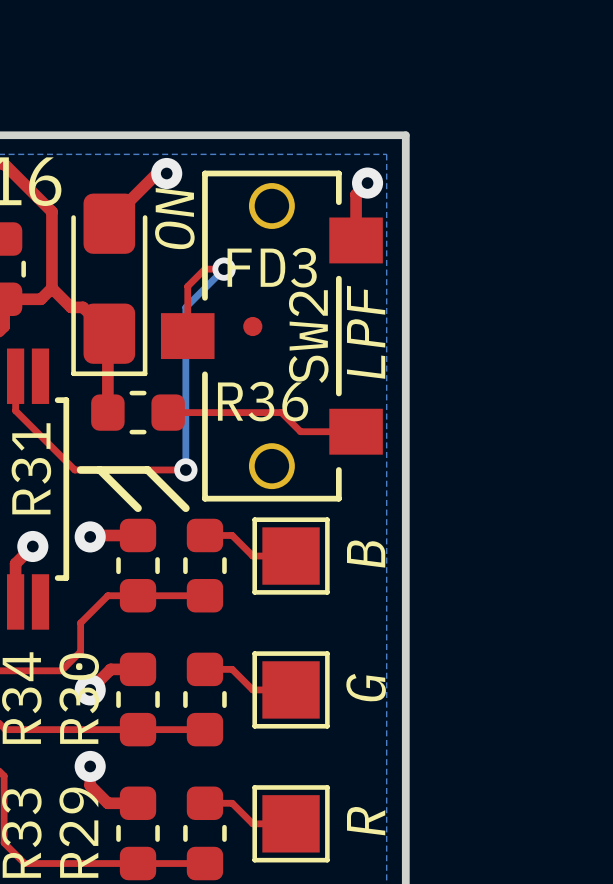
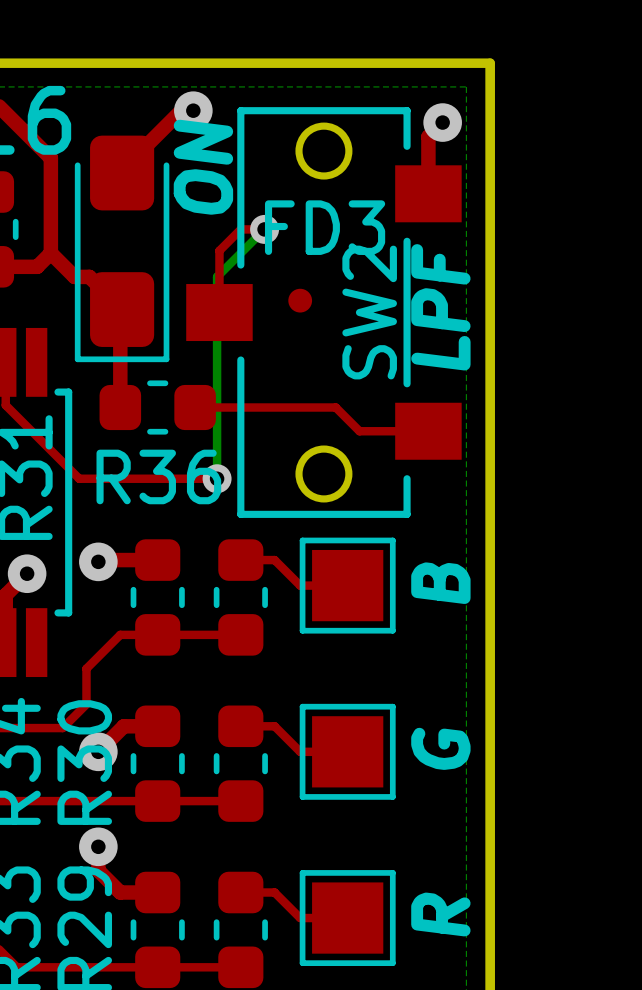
R36 name position: R36 (263, 401) -> R36 (158, 476)
line: (80, 469) (147, 469) (185, 508) -> none
line: (99, 469) (138, 508) -> none

